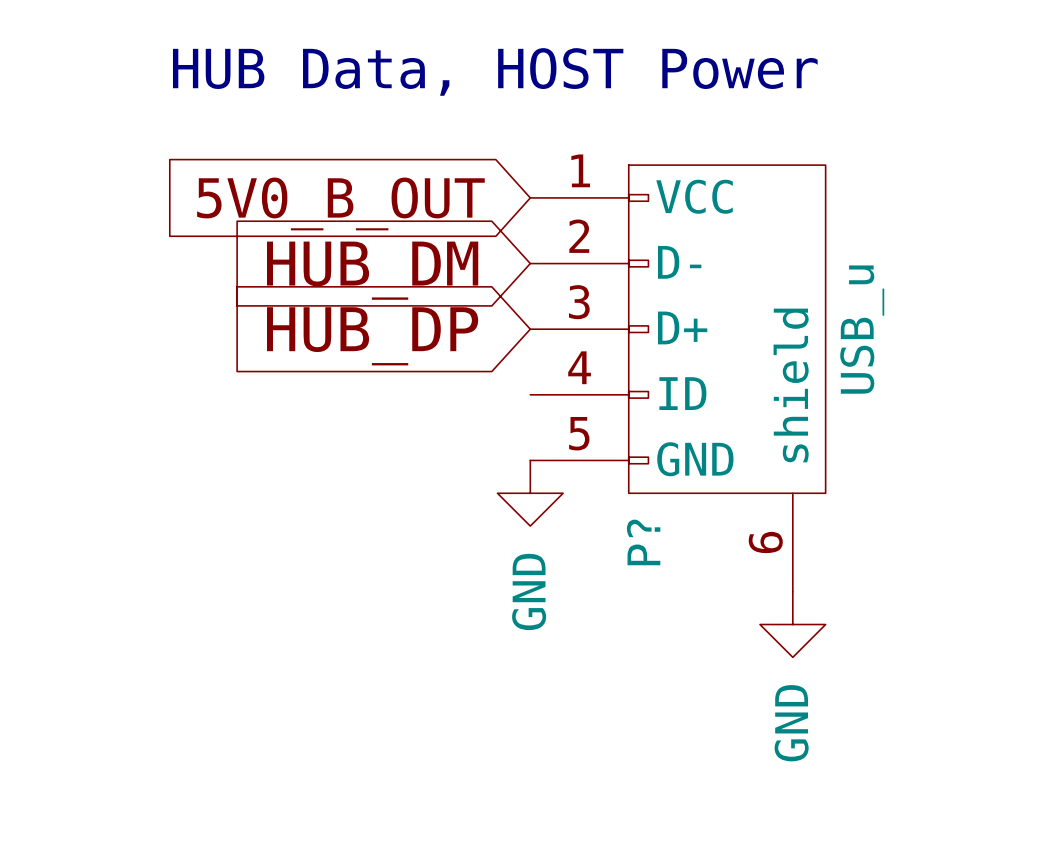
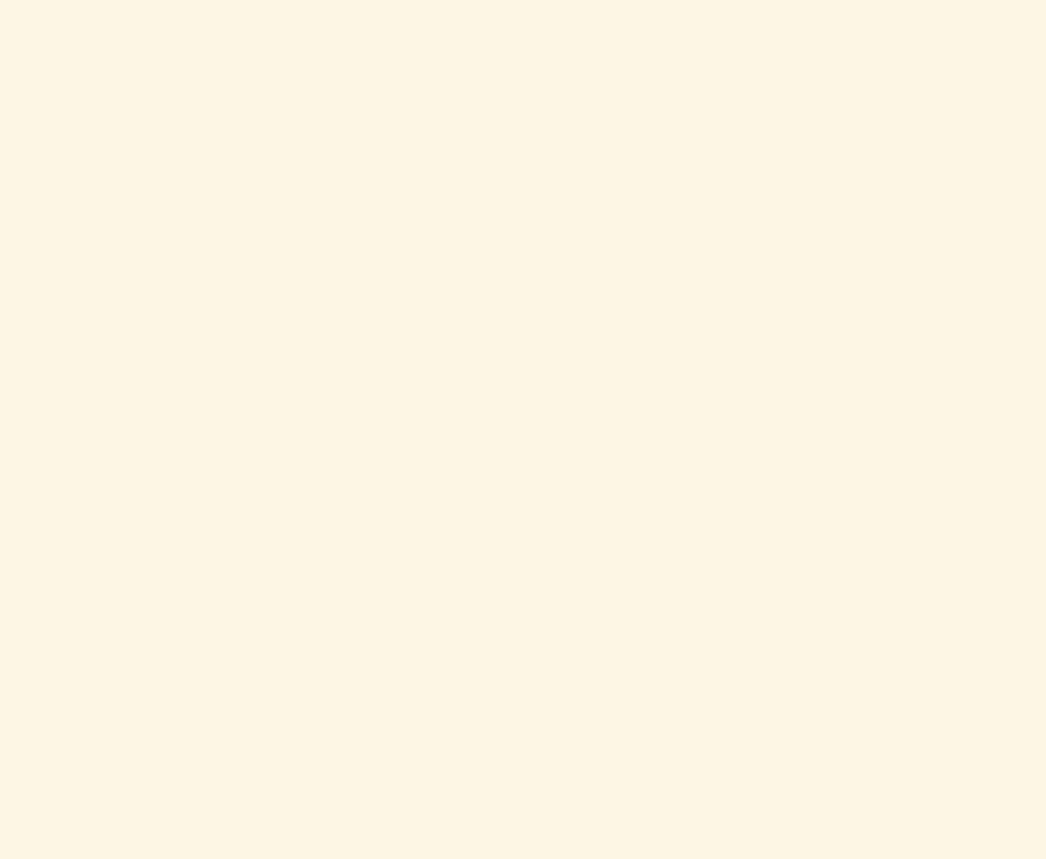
text: HUB Data, HOST Power (495, 71) -> none
global label: 5V0_B_OUT (340, 203) -> none
global label: HUB_DM (372, 270) -> none
global label: HUB_DP (372, 336) -> none
P?: USB_u (677, 378) -> none
power symbol: GND (530, 493) -> none
power symbol: GND (792, 624) -> none

